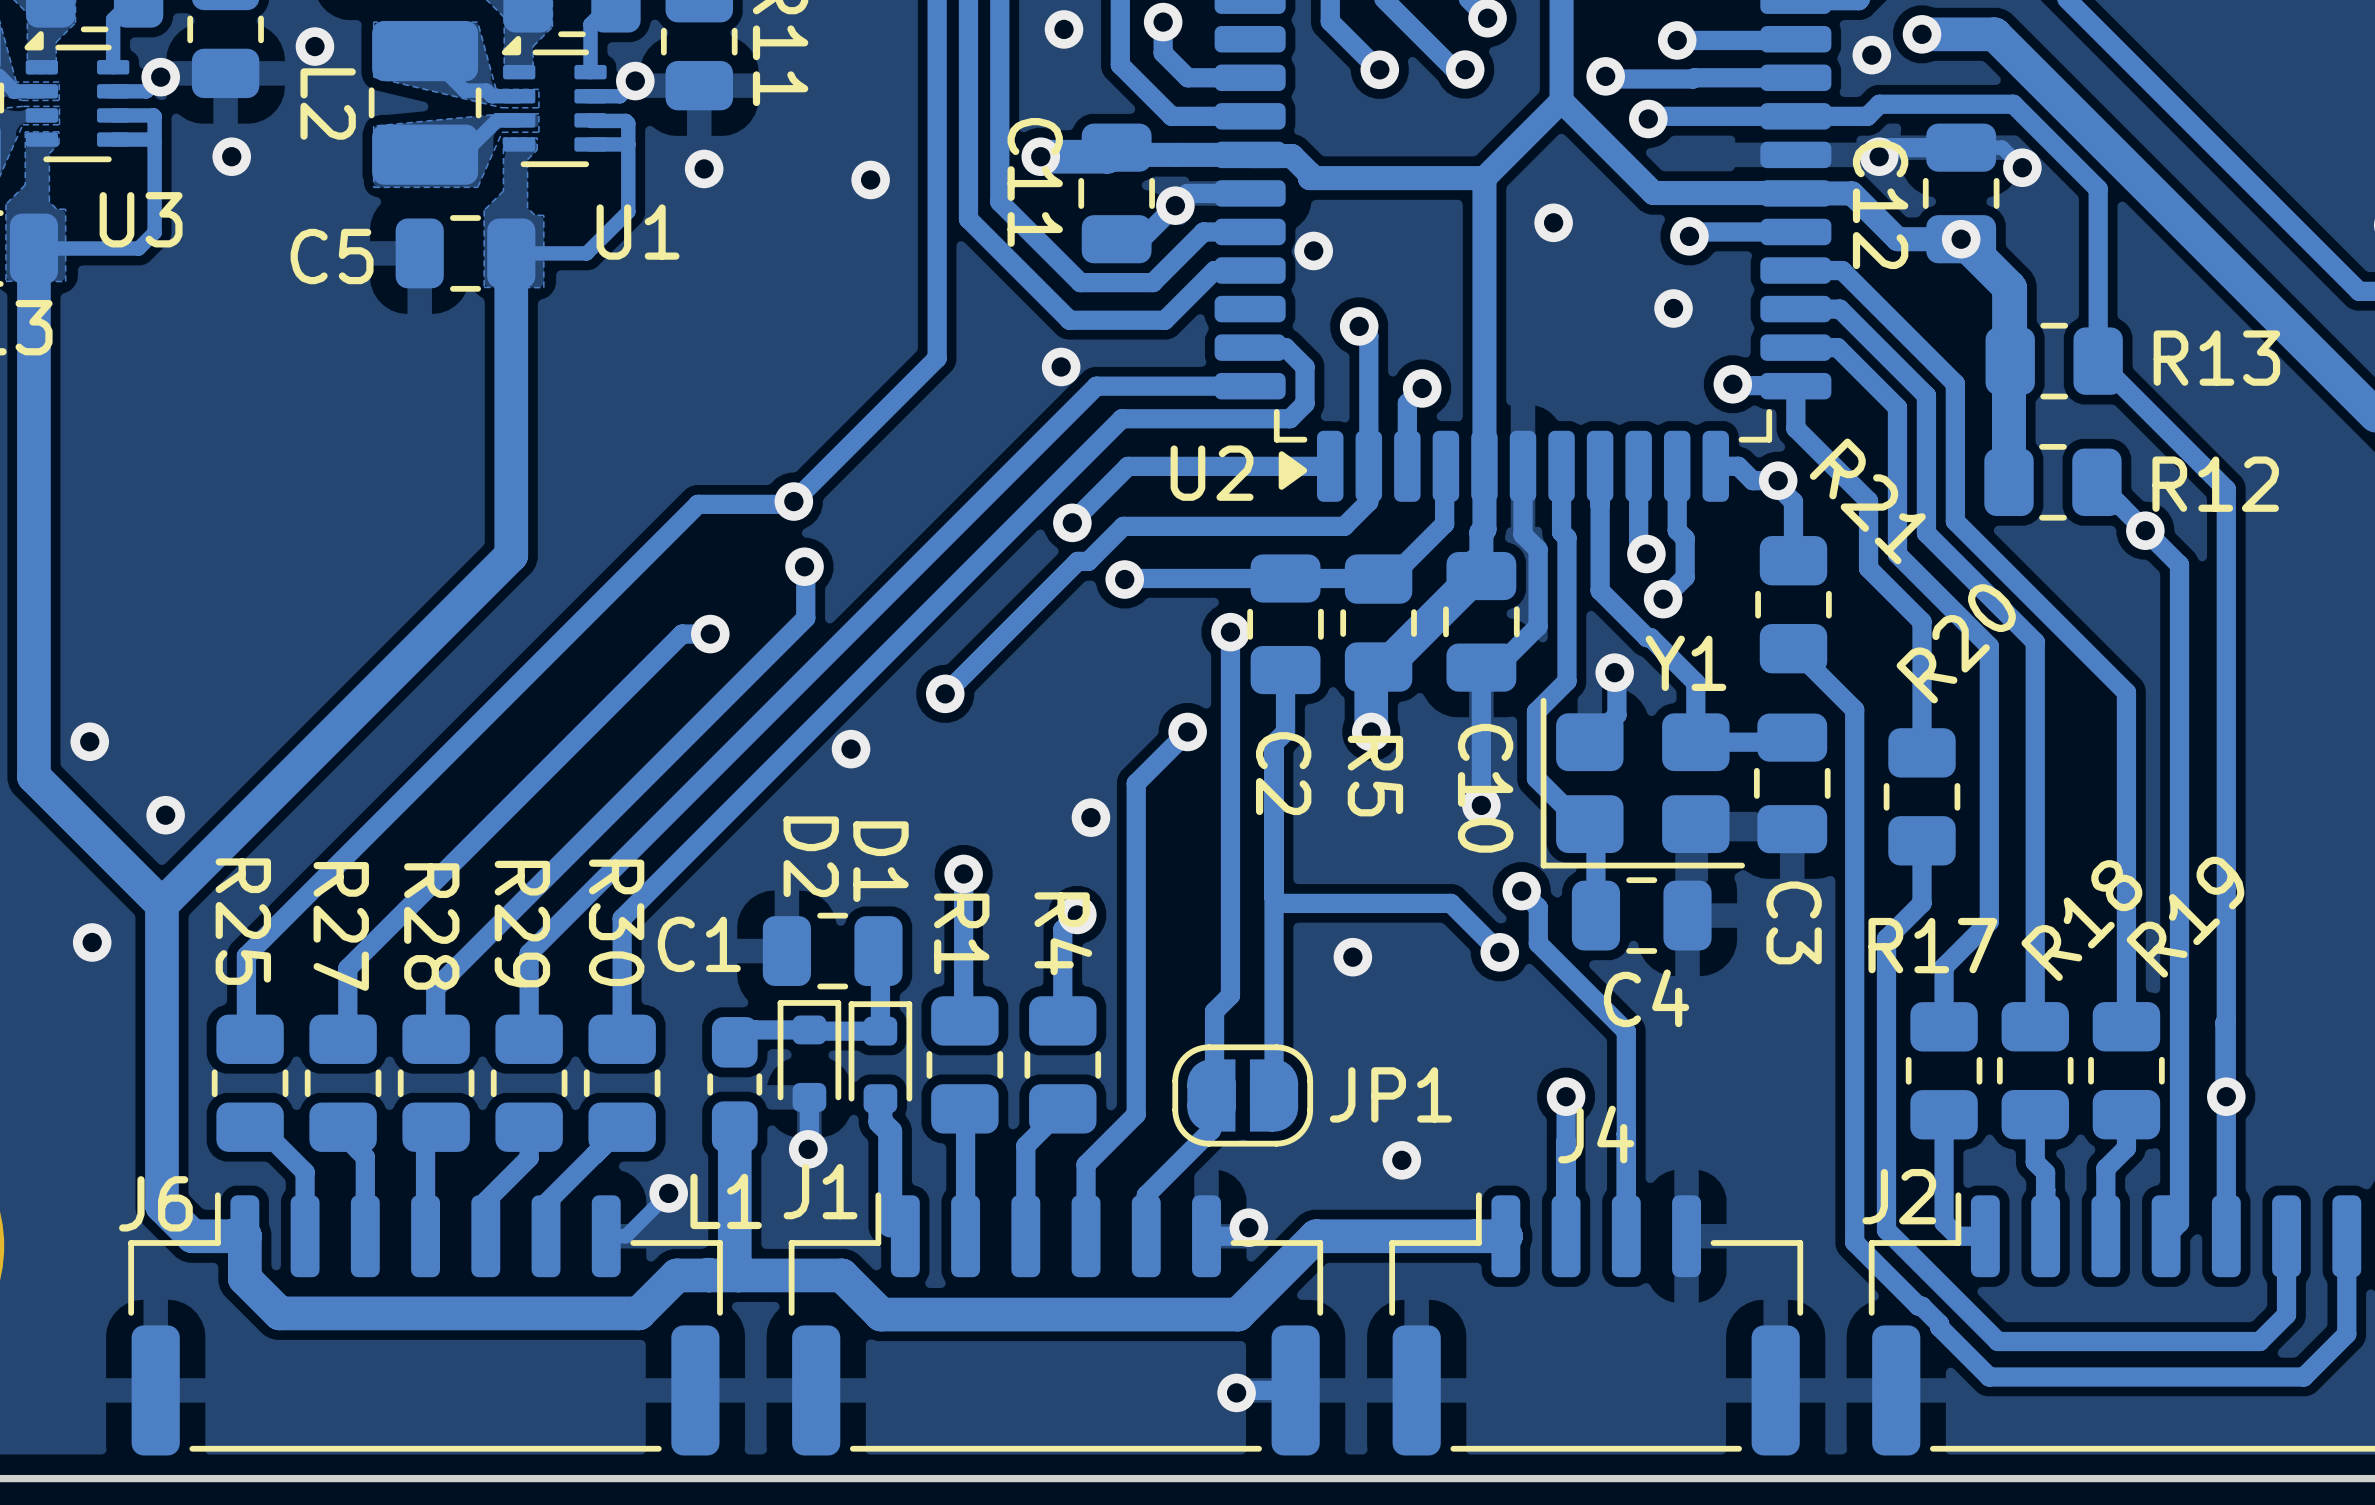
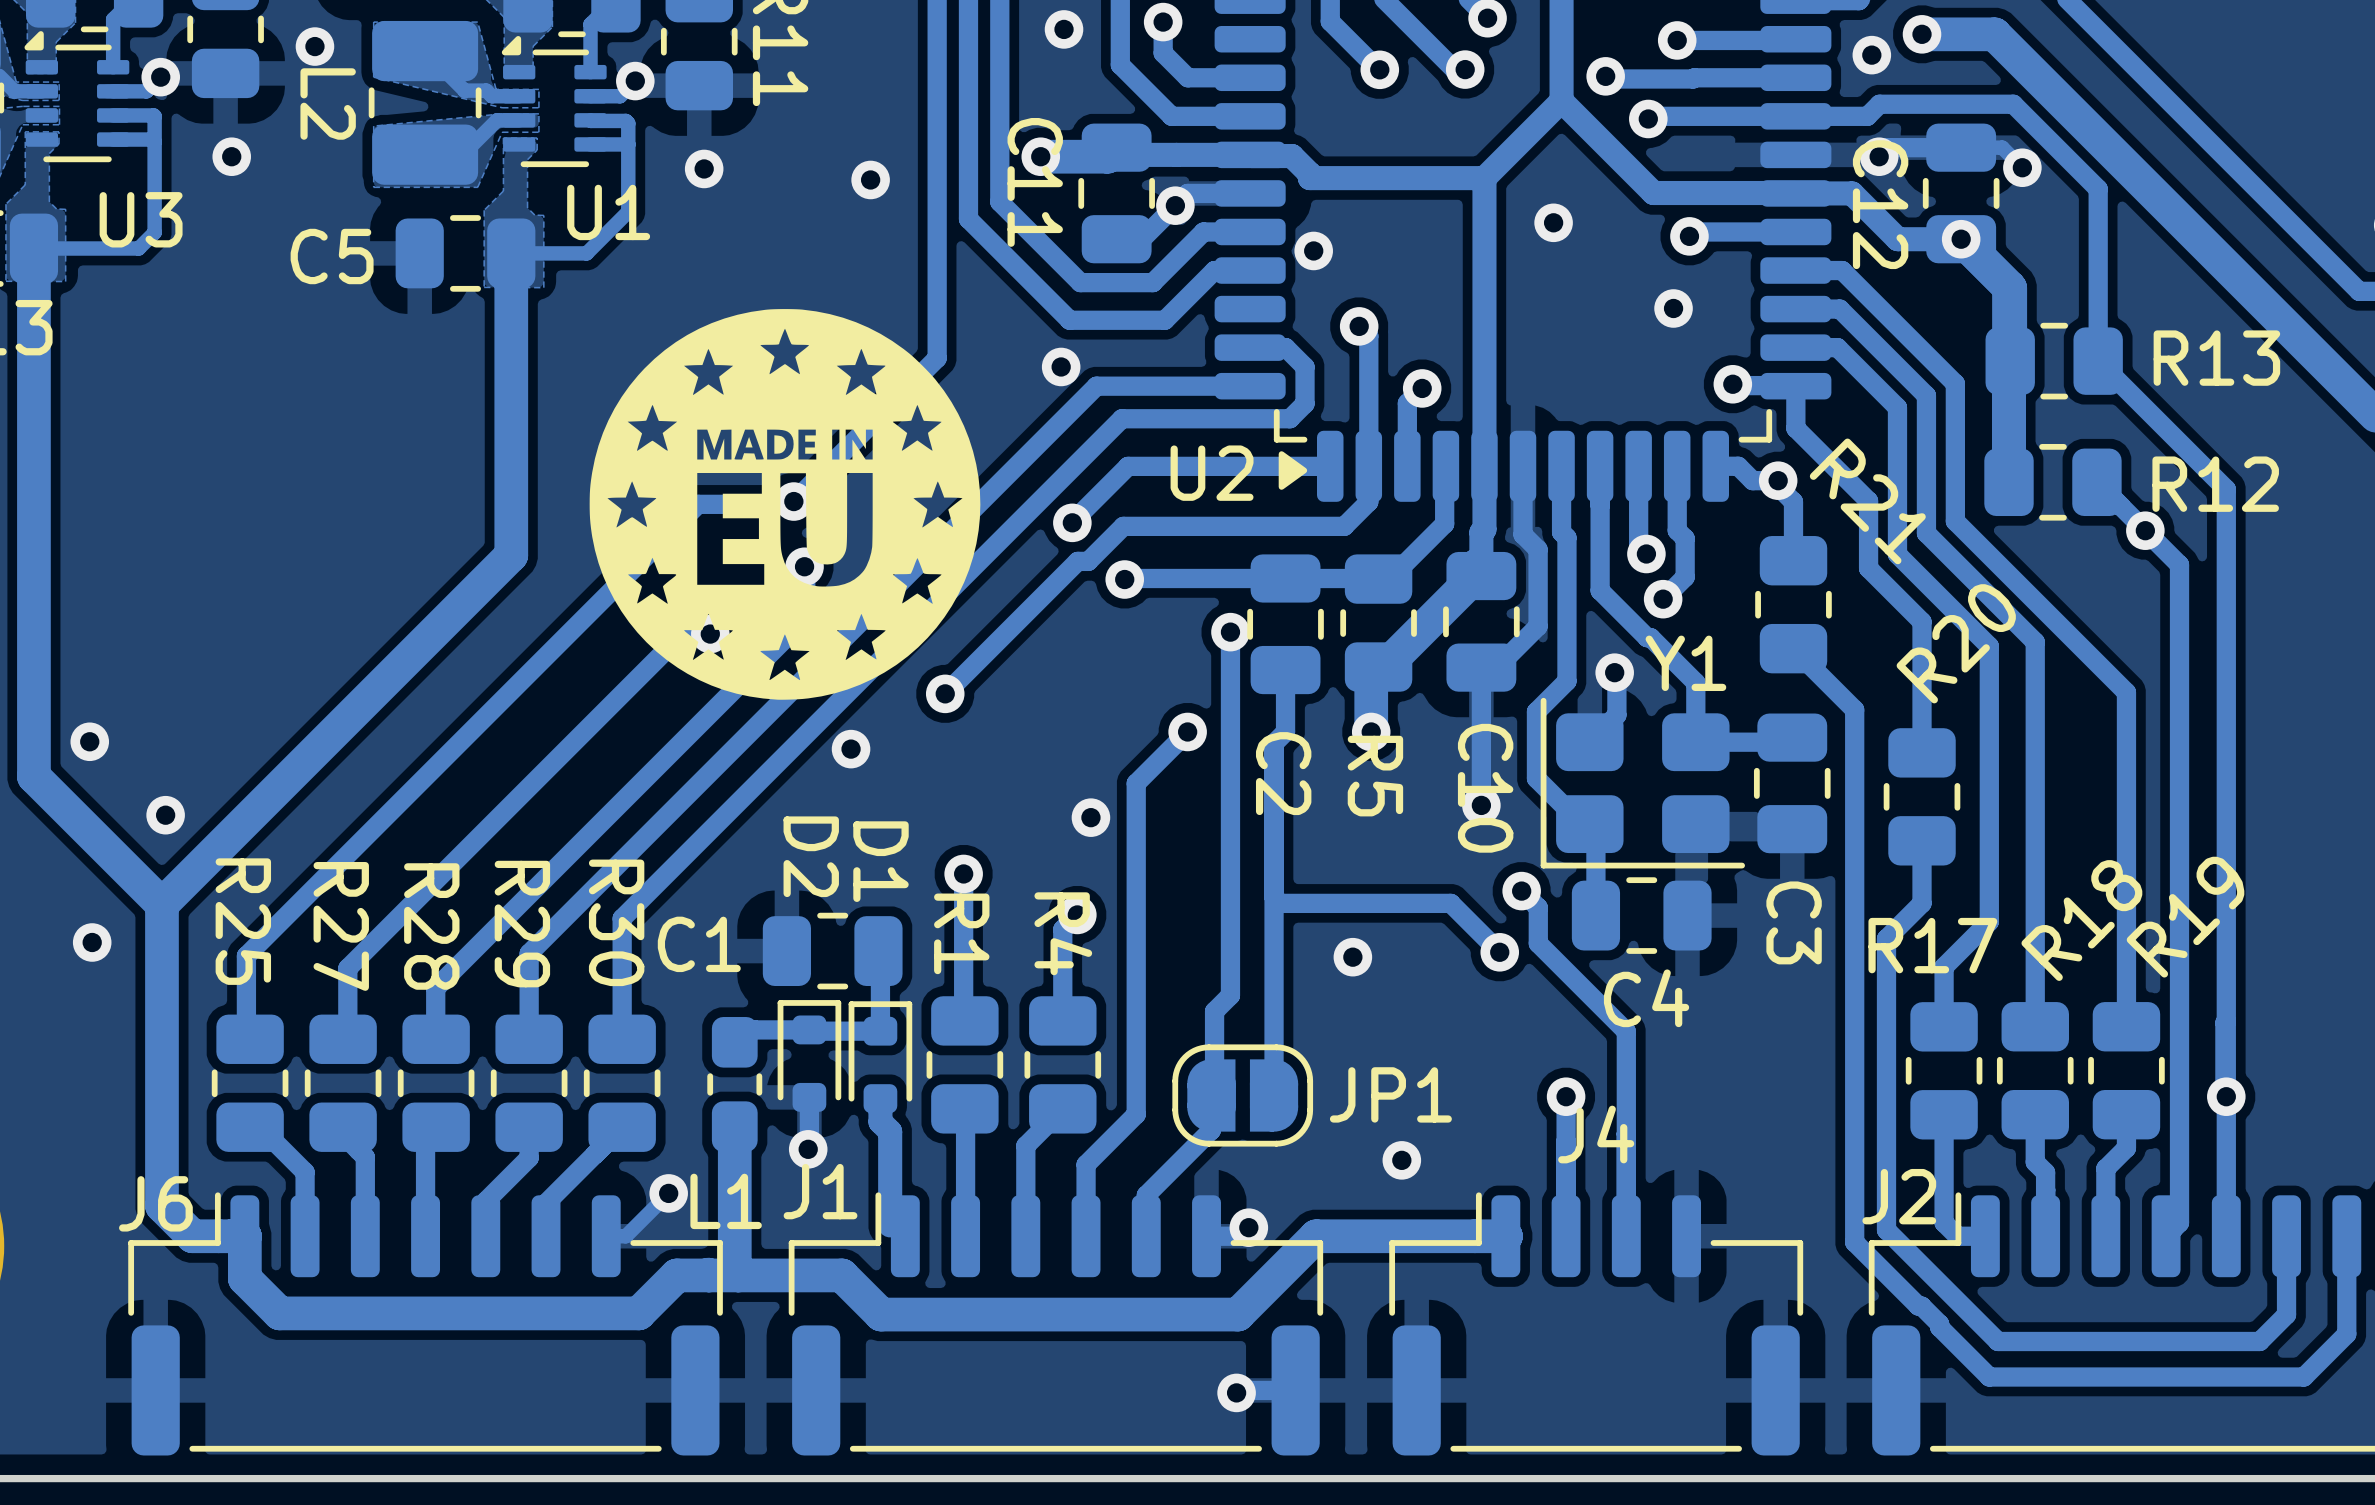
U1 name position: U1 (638, 232) -> U1 (608, 212)
drawing: none -> [589, 309, 981, 700]

